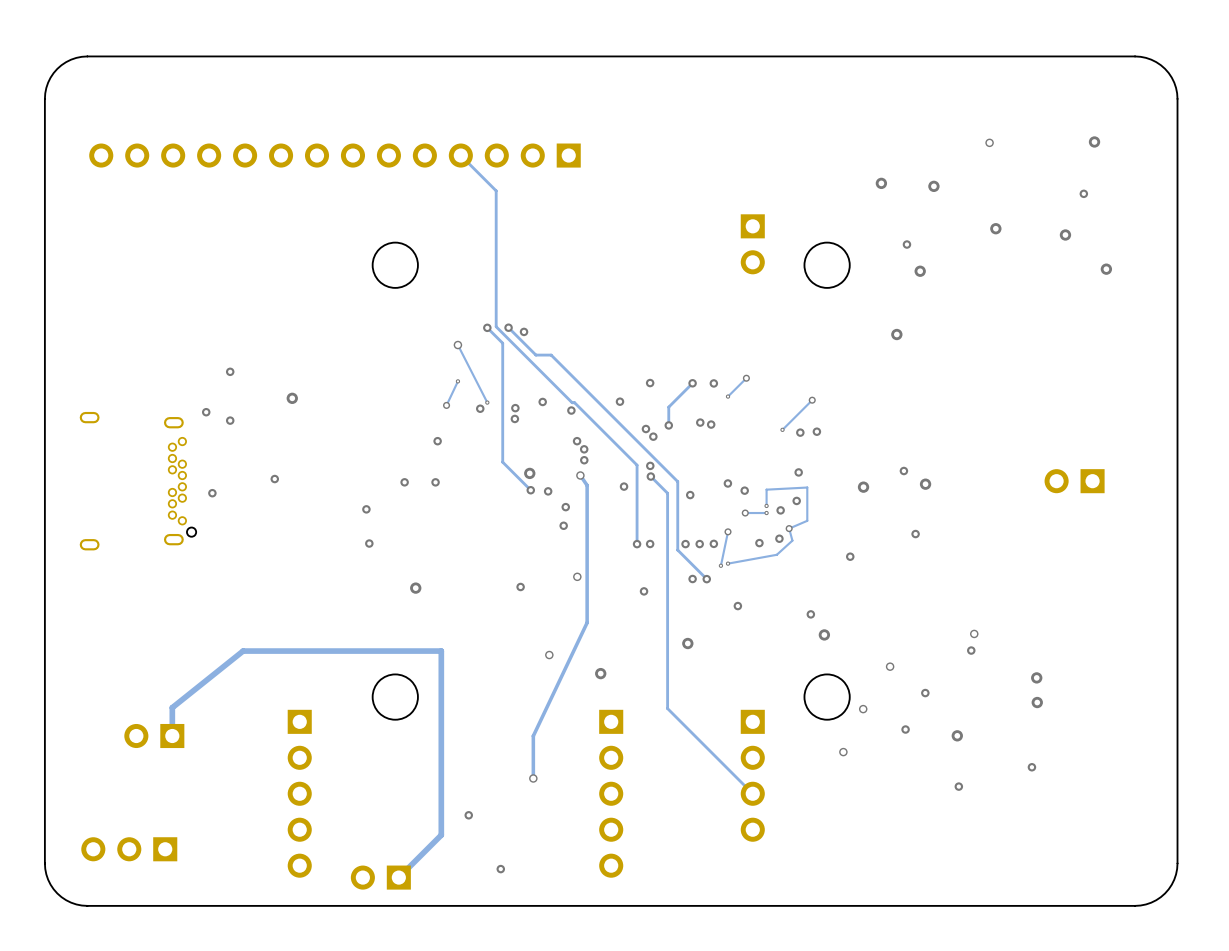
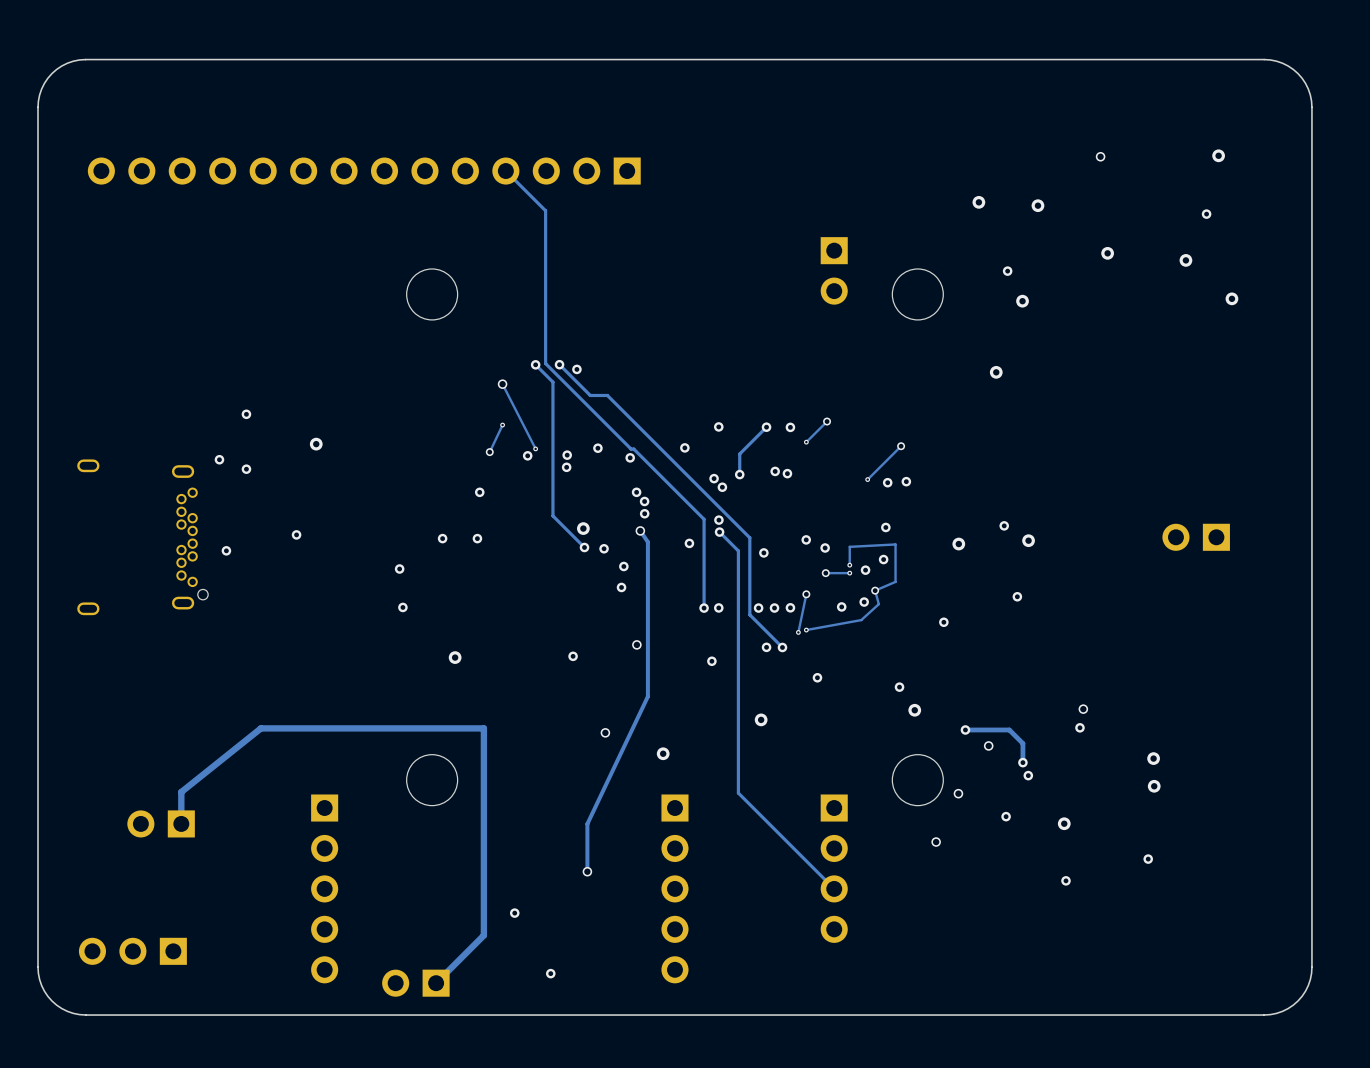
track: none -> (965, 729) (1009, 729) (1022, 743) (1022, 762)
via: none -> (965, 729)
via: none -> (1022, 762)

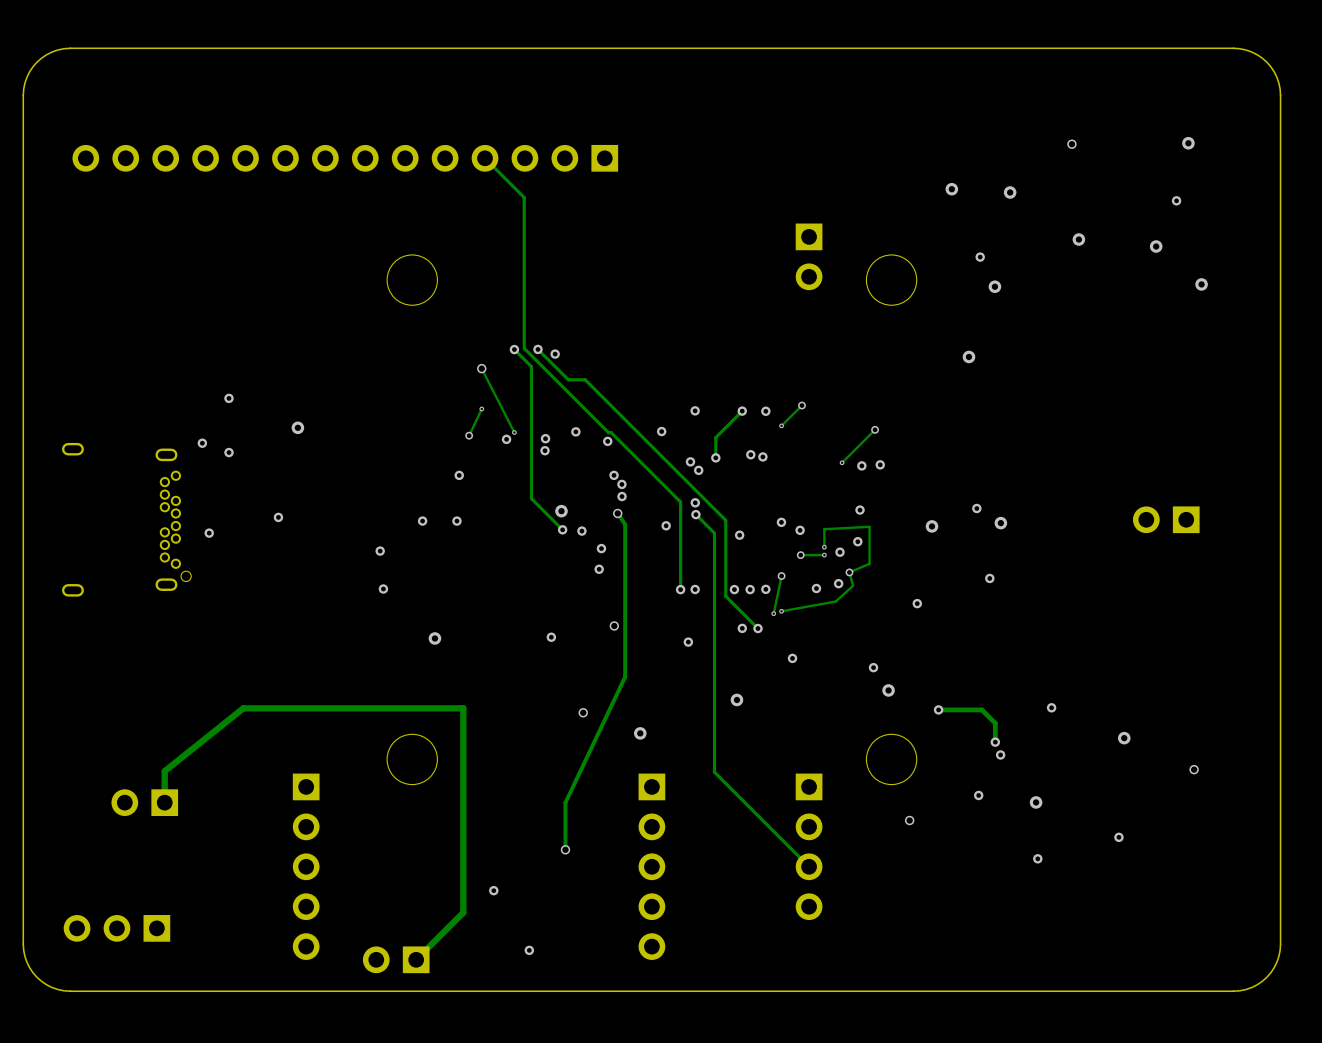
via: (1083, 709) -> none
via: (988, 745) -> none
via: (1154, 786) -> none
via: none -> (1194, 769)
via: (958, 793) -> none

